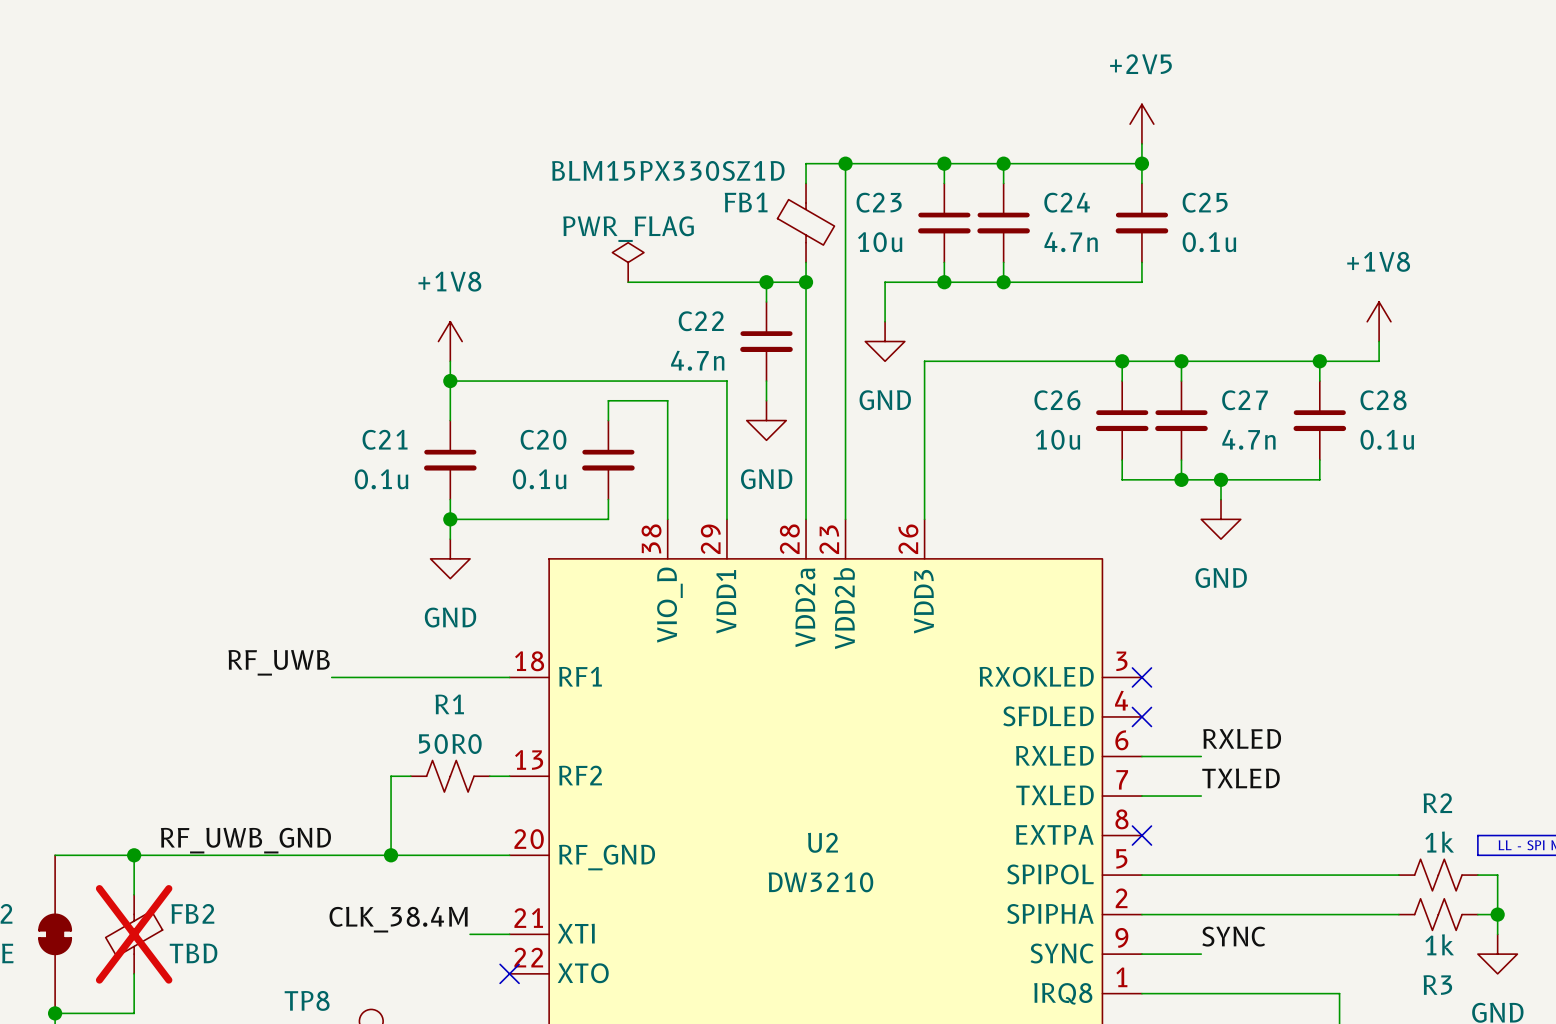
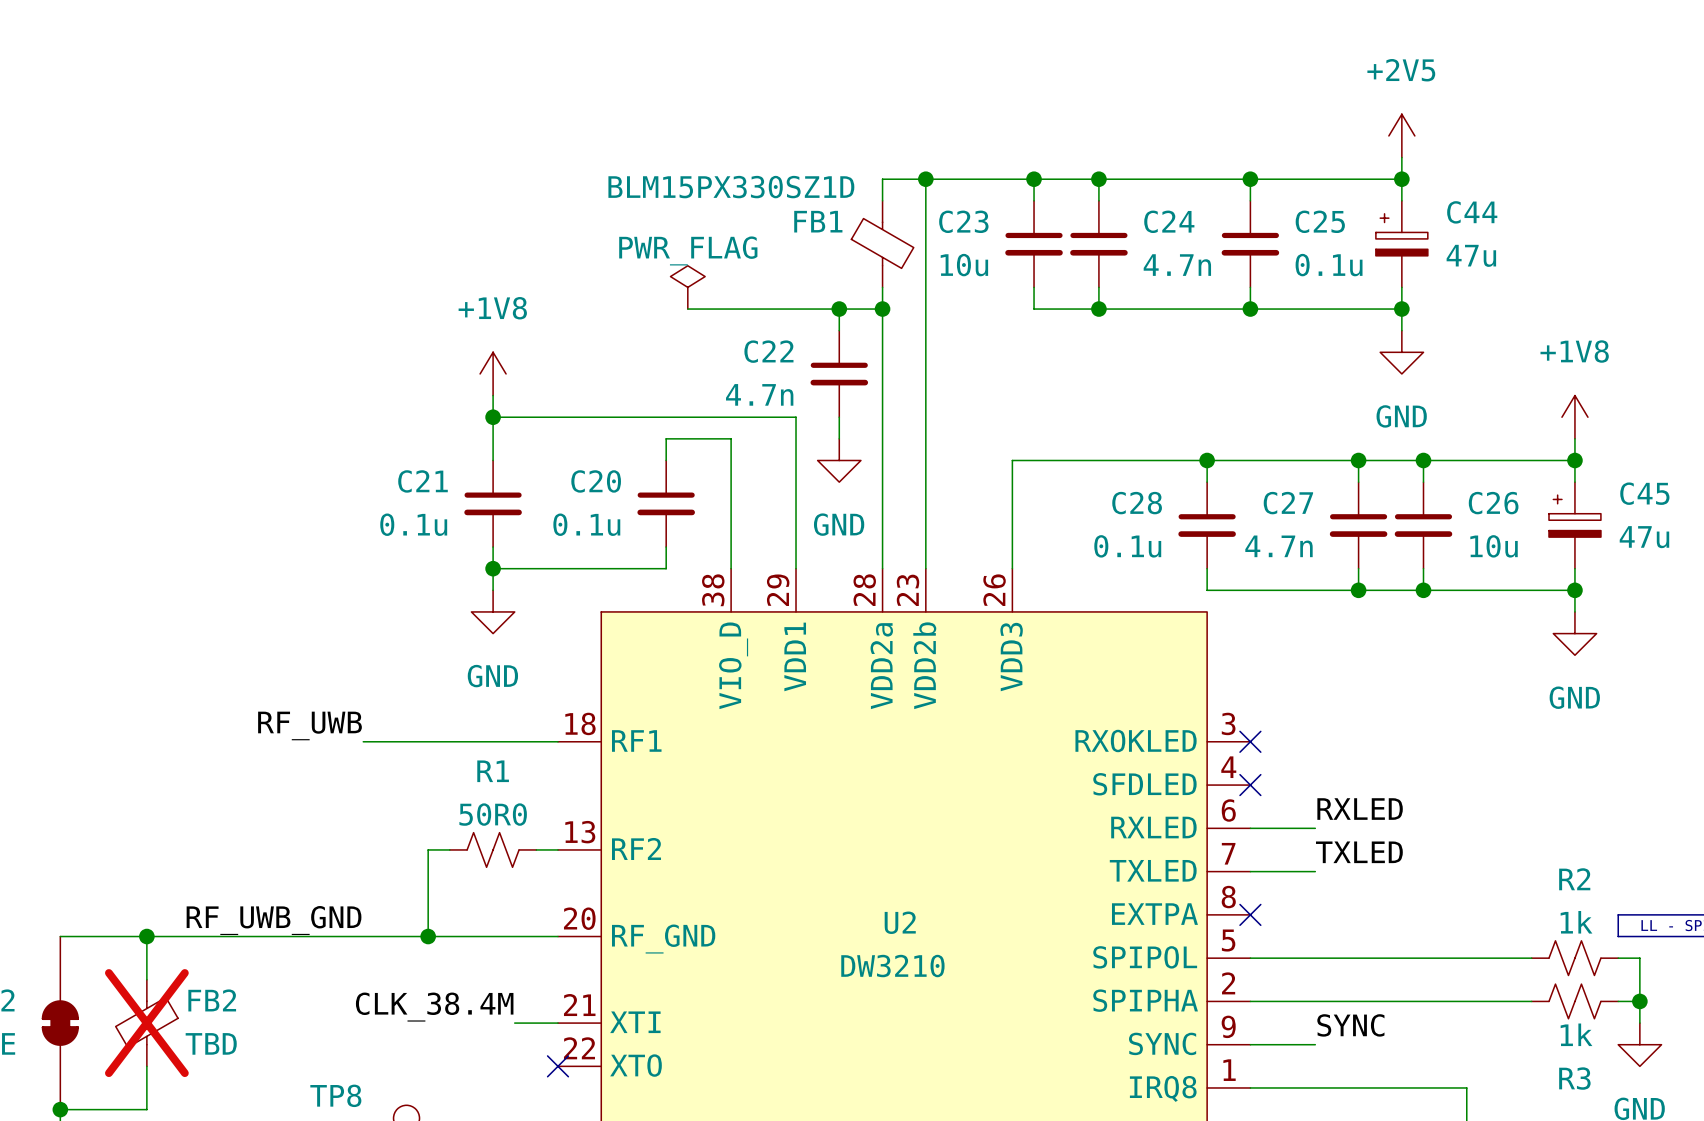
power symbol position: +2V5 (1141, 124) -> +2V5 (1401, 135)
wire: (1141, 143) (1141, 163) -> (1401, 179) (1250, 179)
wire: none -> (1401, 157) (1401, 200)
junction: none -> (1401, 179)
C44: none -> 47u (1401, 244)
wire: none -> (1401, 287) (1401, 330)
wire: (944, 282) (885, 282) (885, 321) -> none
junction: (944, 282) -> none
wire: none -> (1250, 309) (1401, 309)
junction: none -> (1250, 309)
junction: none -> (1401, 309)
power symbol: none -> GND (1401, 352)
power symbol position: +1V8 (1379, 321) -> +1V8 (1574, 417)
power symbol: GND (885, 341) -> none
wire: (1379, 341) (1379, 361) (924, 361) (924, 420) -> (1574, 460) (1012, 460)
wire: (1122, 361) (1122, 381) -> (1358, 460) (1358, 482)
junction: (1122, 361) -> none
wire: (1181, 361) (1181, 381) -> (1423, 460) (1423, 482)
junction: (1181, 361) -> none
wire: (1319, 361) (1319, 381) -> (1207, 460) (1207, 482)
junction: (1319, 361) -> none
C26 name position: C26 (1057, 400) -> C26 (1493, 503)
C27 name position: C27 (1244, 400) -> C27 (1288, 503)
C28 name position: C28 (1383, 400) -> C28 (1137, 503)
wire: none -> (1574, 438) (1574, 482)
junction: none -> (1207, 460)
C26 position: (1122, 420) -> (1423, 525)
C27 position: (1181, 420) -> (1358, 525)
junction: none -> (1358, 460)
junction: none -> (1423, 460)
C28 position: (1319, 420) -> (1207, 525)
junction: none -> (1574, 460)
C26 value position: 10u (1057, 439) -> 10u (1494, 546)
C27 value position: 4.7n (1248, 439) -> 4.7n (1278, 546)
C28 value position: 0.1u (1387, 439) -> 0.1u (1127, 546)
wire: (1122, 460) (1122, 479) (1319, 479) (1319, 460) -> none
wire: (1181, 460) (1181, 479) -> (1423, 568) (1423, 590)
junction: (1181, 479) -> none
wire: (1221, 479) (1221, 499) -> (1358, 568) (1358, 590)
junction: (1221, 479) -> none
C45: none -> 47u (1574, 525)
wire: none -> (1207, 568) (1207, 590) (1574, 590)
power symbol: GND (1221, 519) -> none
wire: none -> (1574, 568) (1574, 611)
junction: none -> (1358, 590)
junction: none -> (1423, 590)
junction: none -> (1574, 590)
power symbol: none -> GND (1574, 633)

